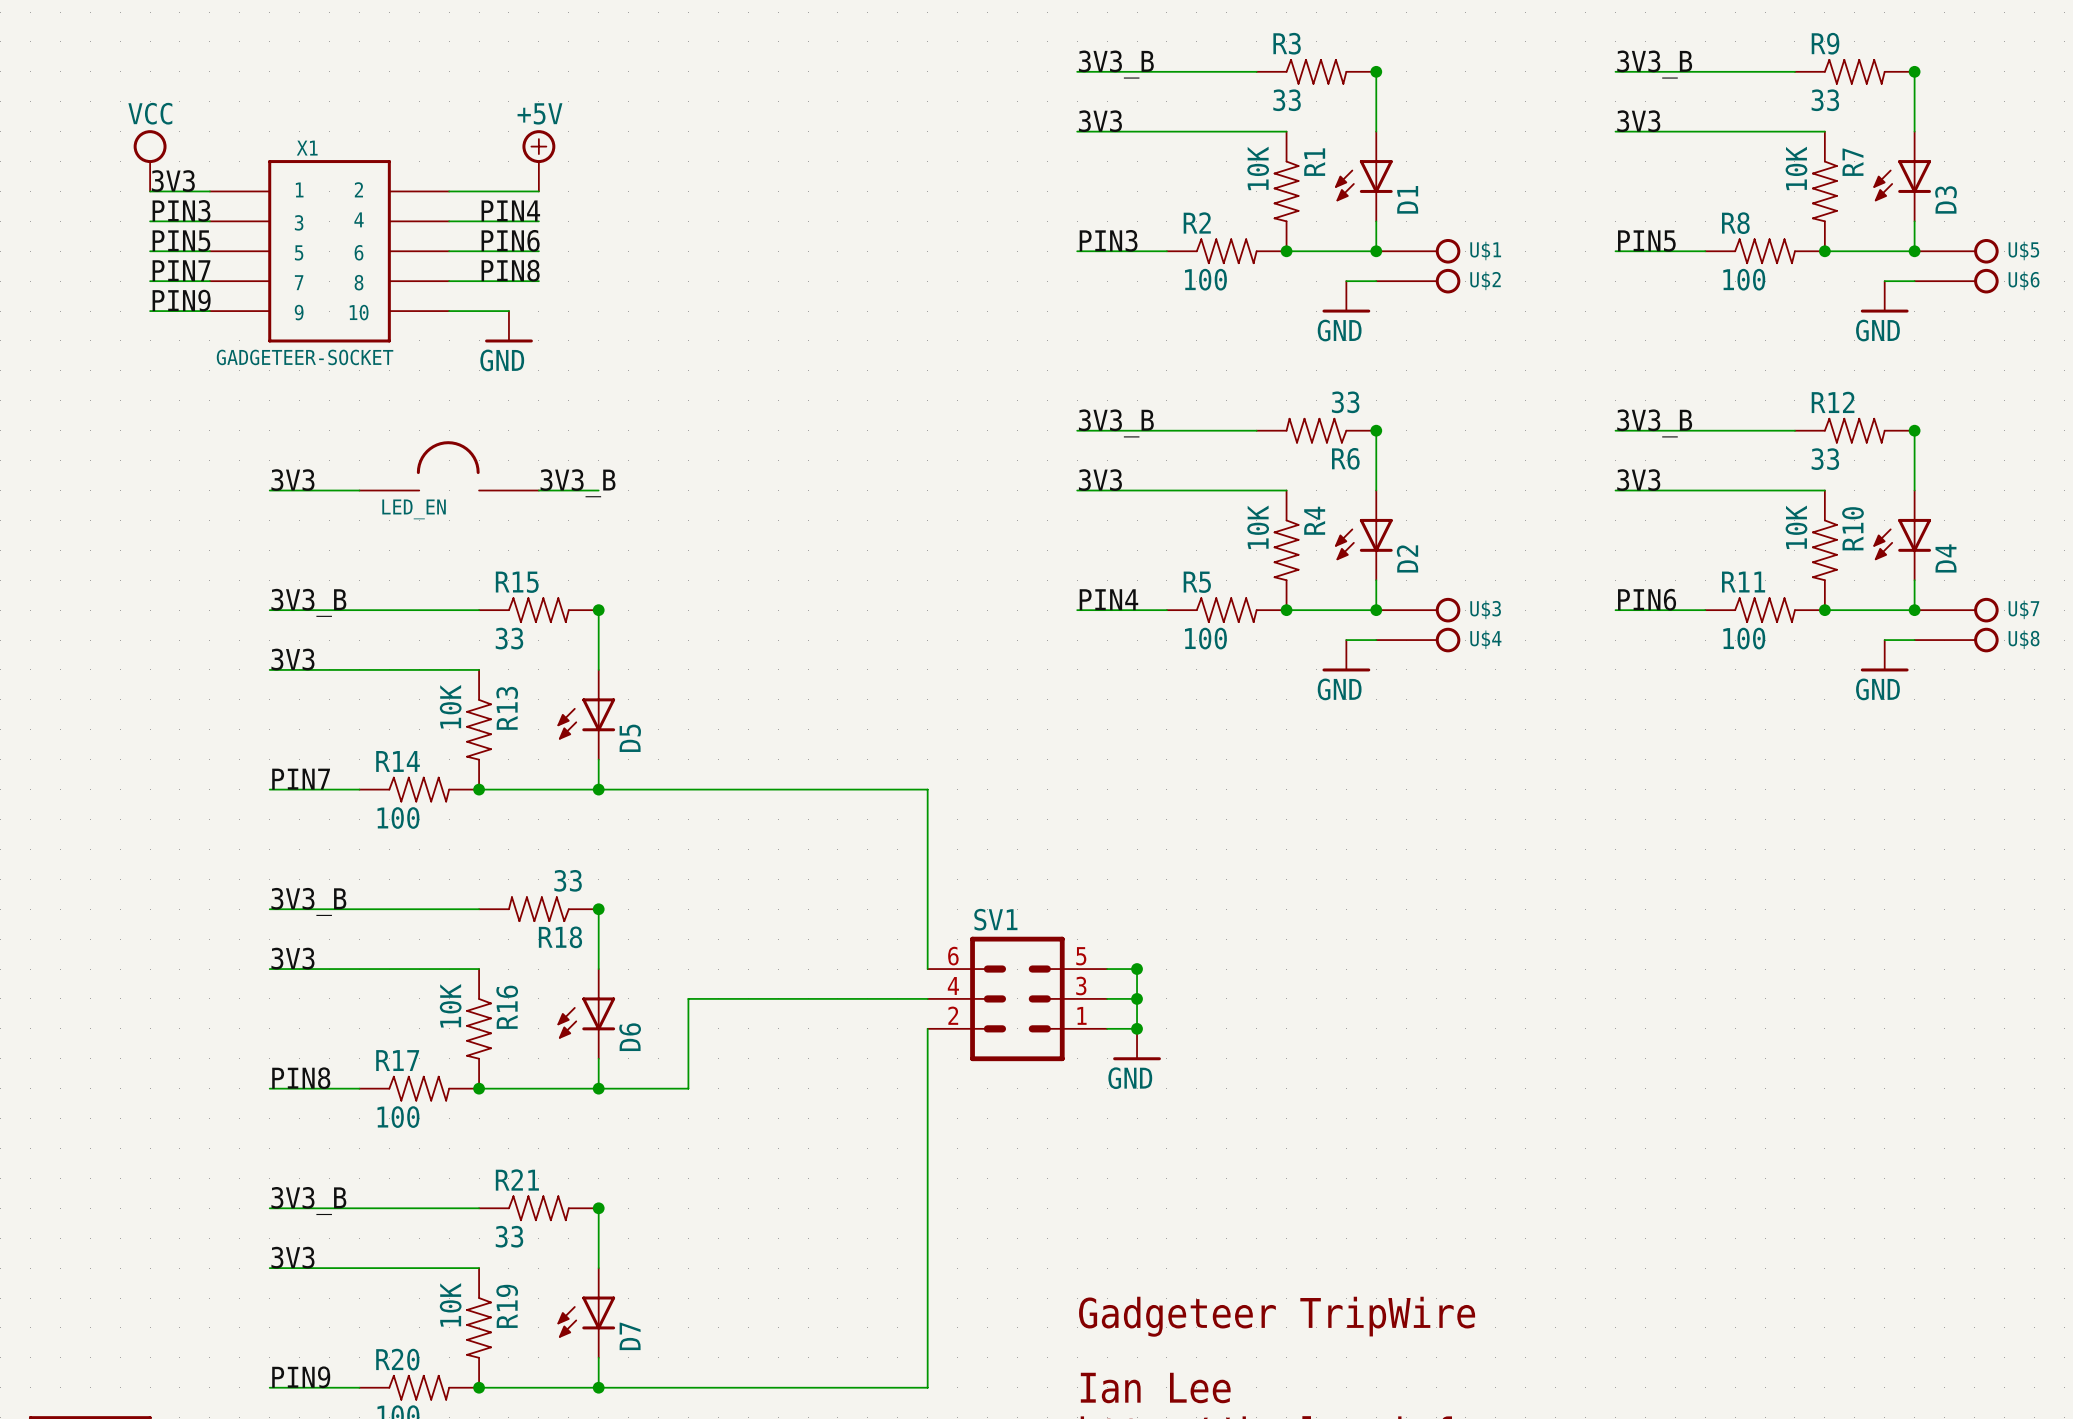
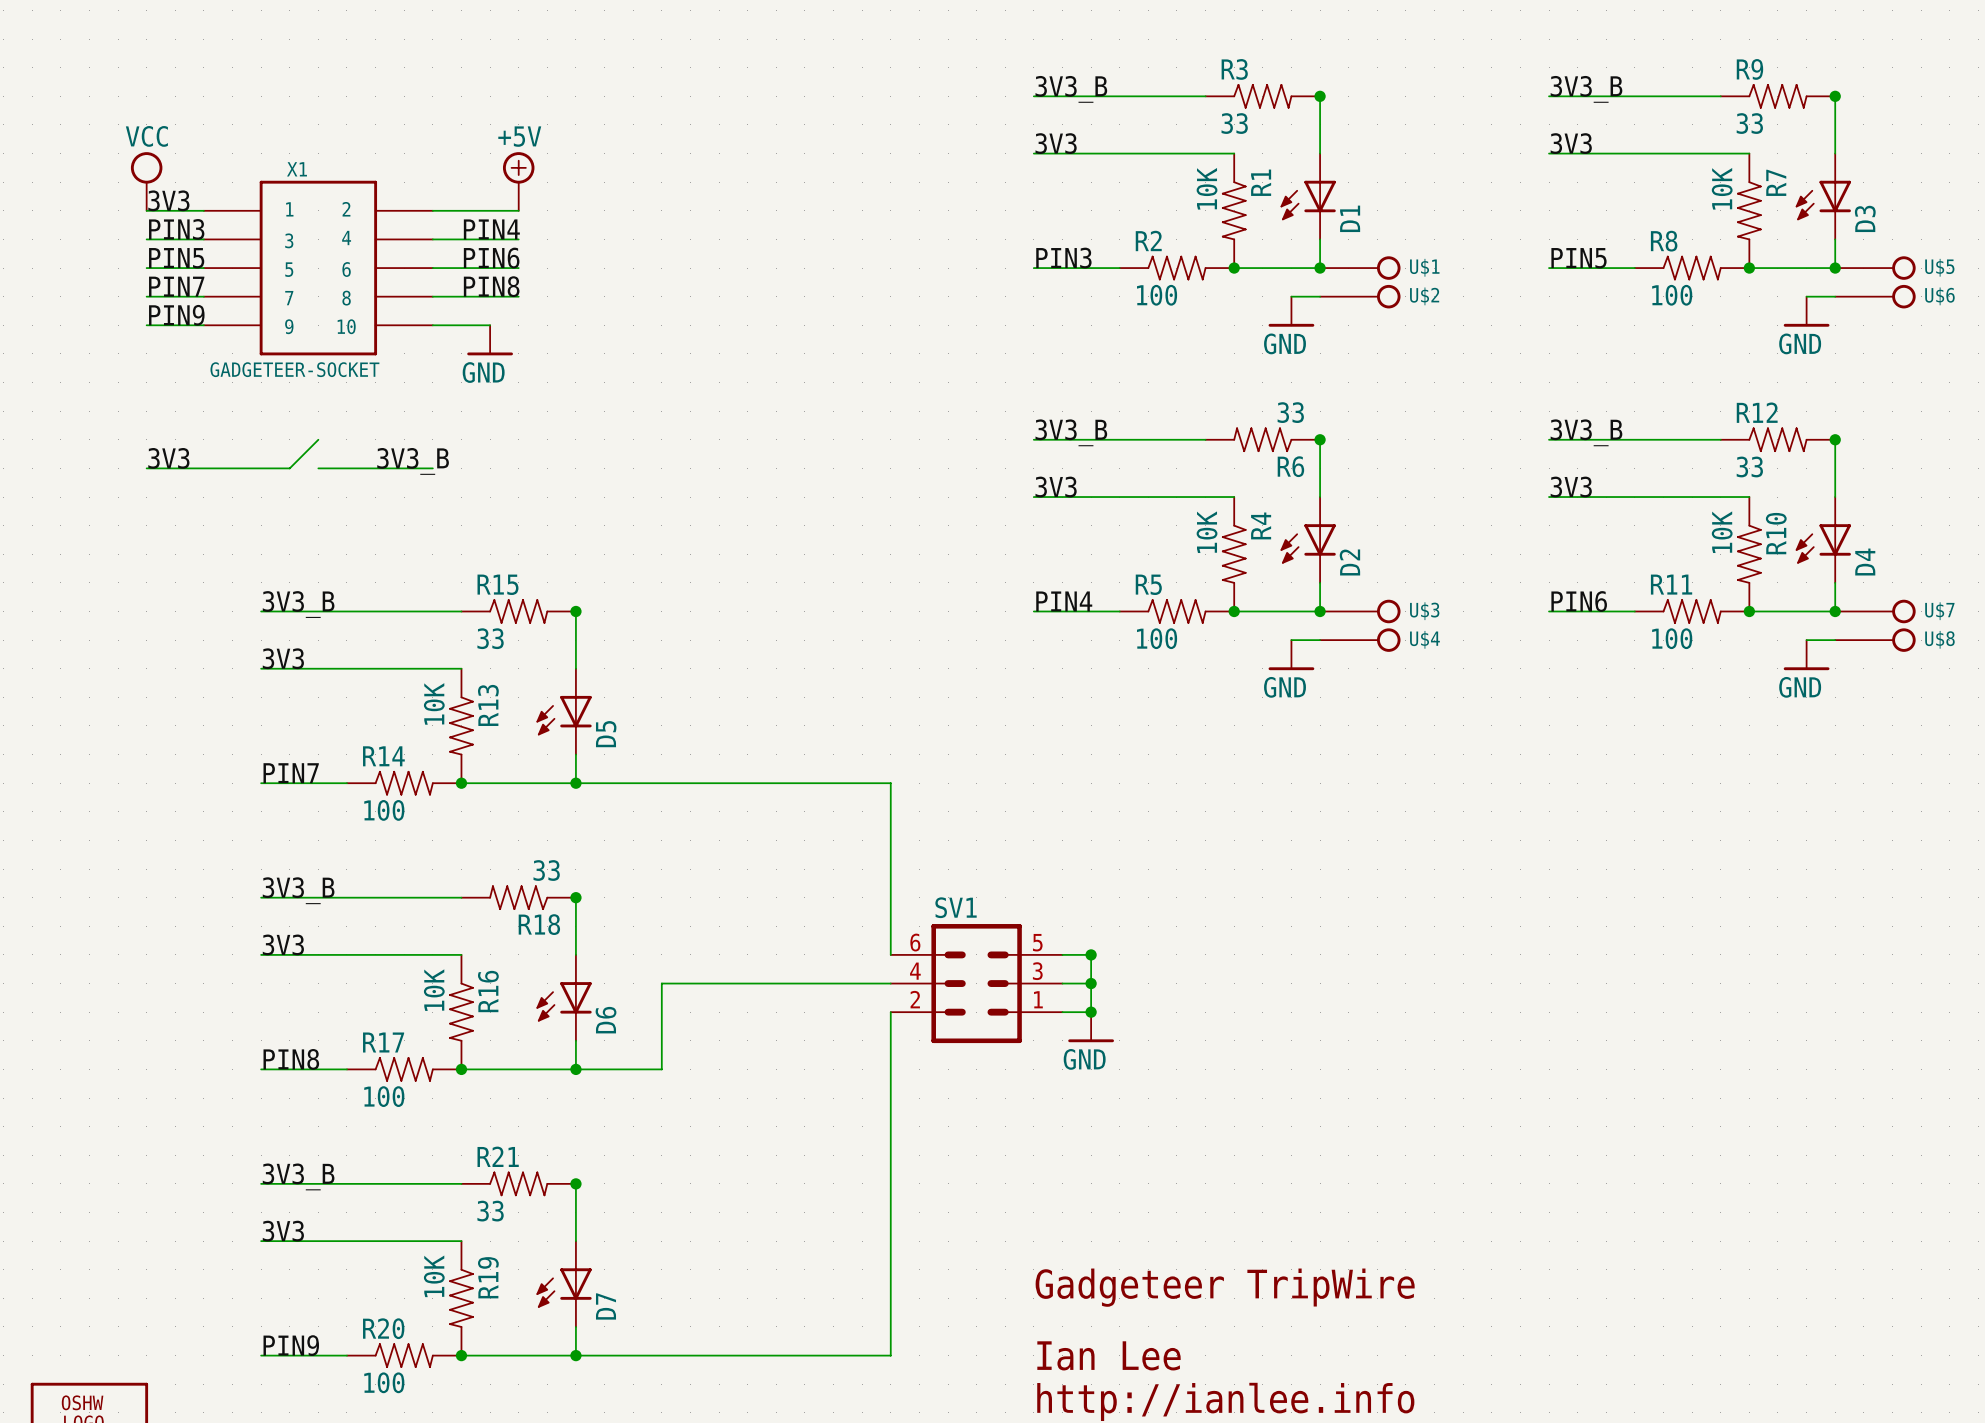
wire: none -> (318, 439) (289, 468) (146, 468)
wire: none -> (318, 468) (432, 468)
LED_EN: (449, 465) -> none
label position: 3V3 (292, 480) -> 3V3 (168, 458)
label position: 3V3_B (578, 483) -> 3V3_B (413, 461)
wire: (269, 490) (359, 490) -> none
wire: (538, 490) (598, 490) -> none

